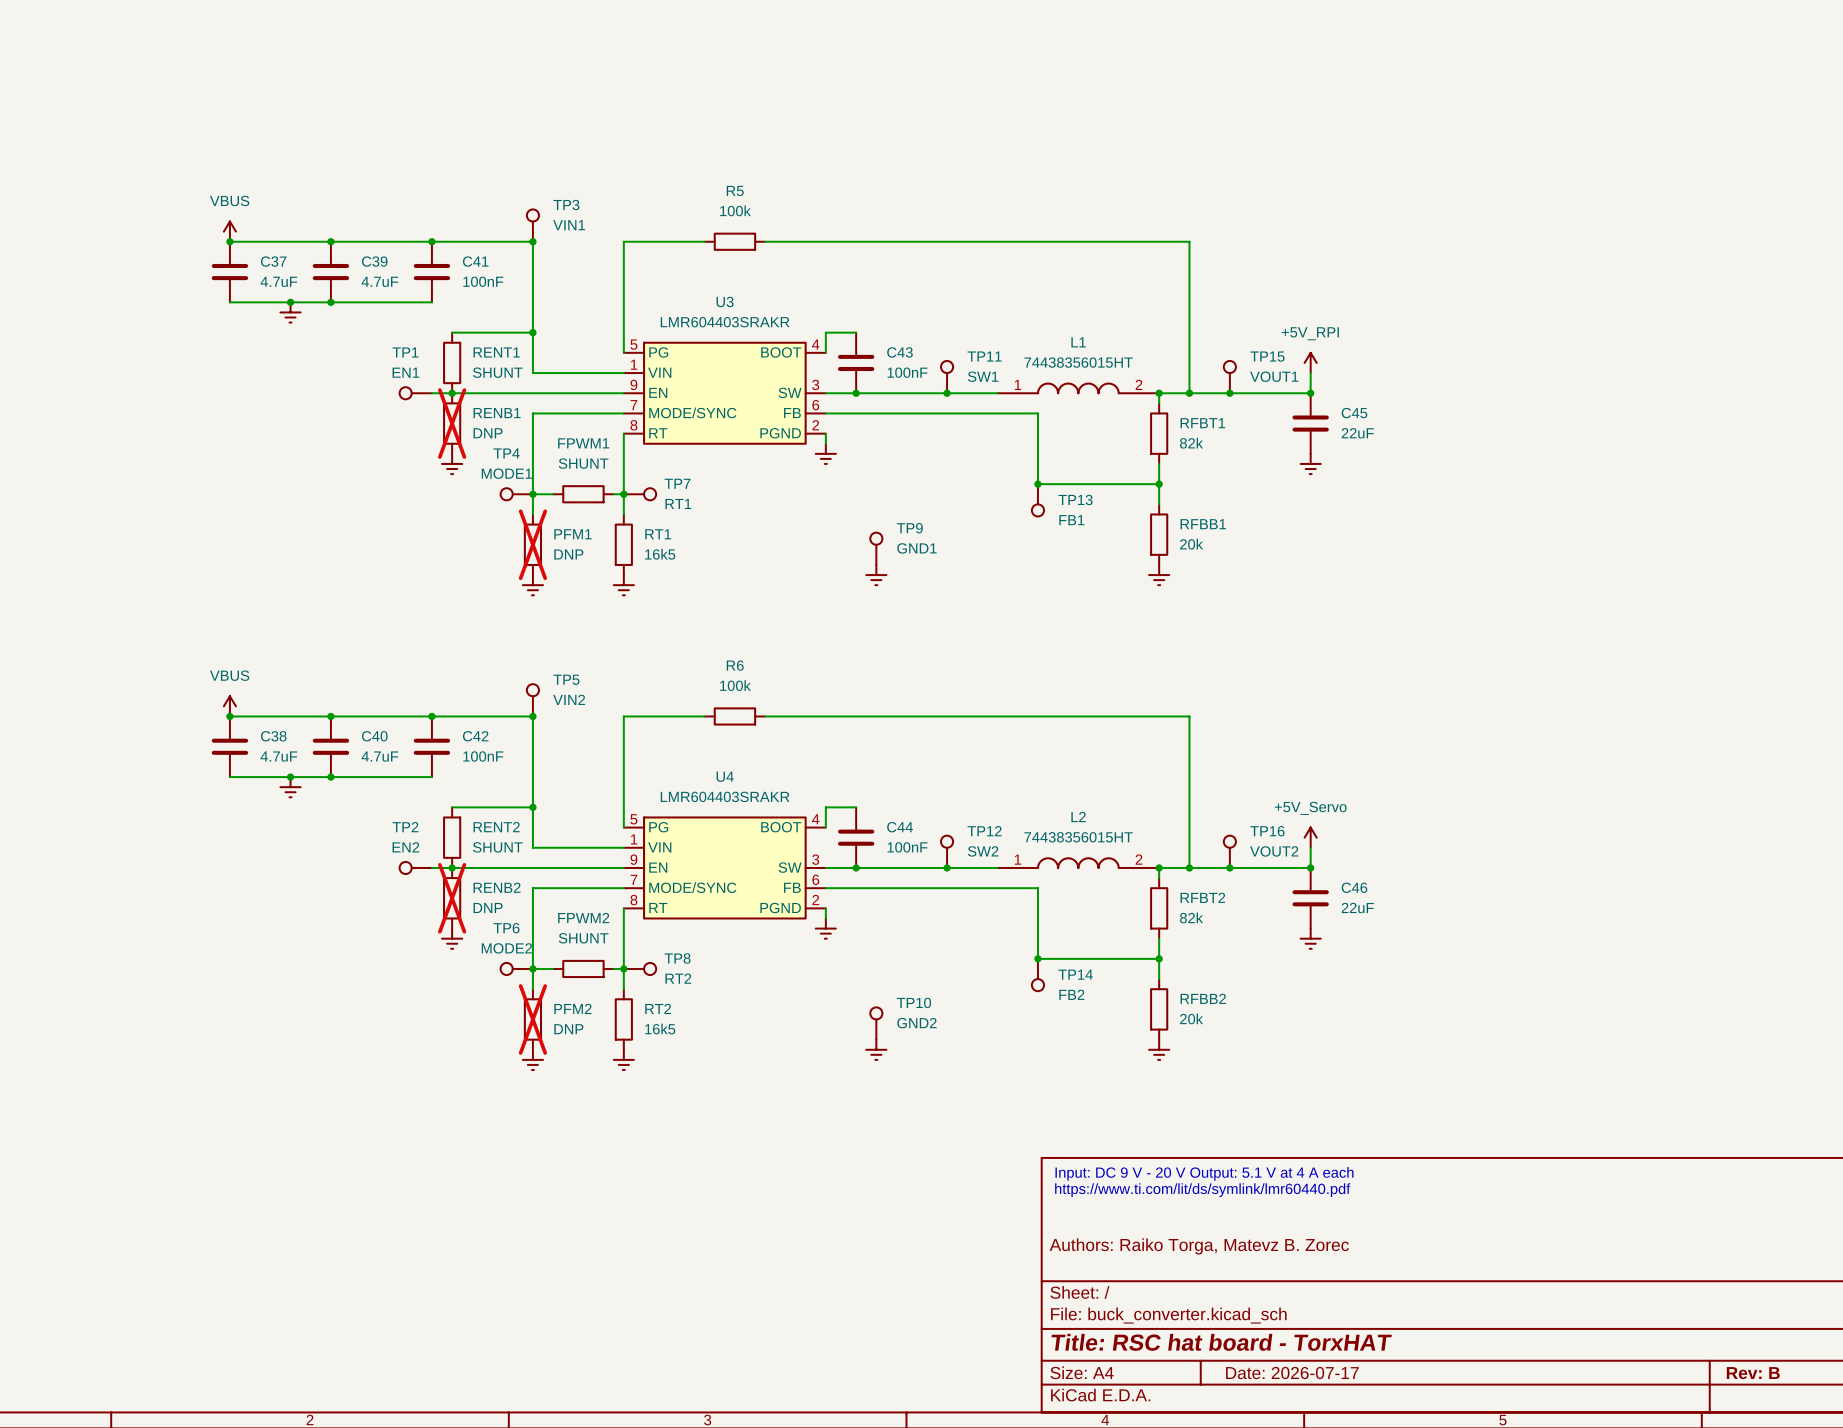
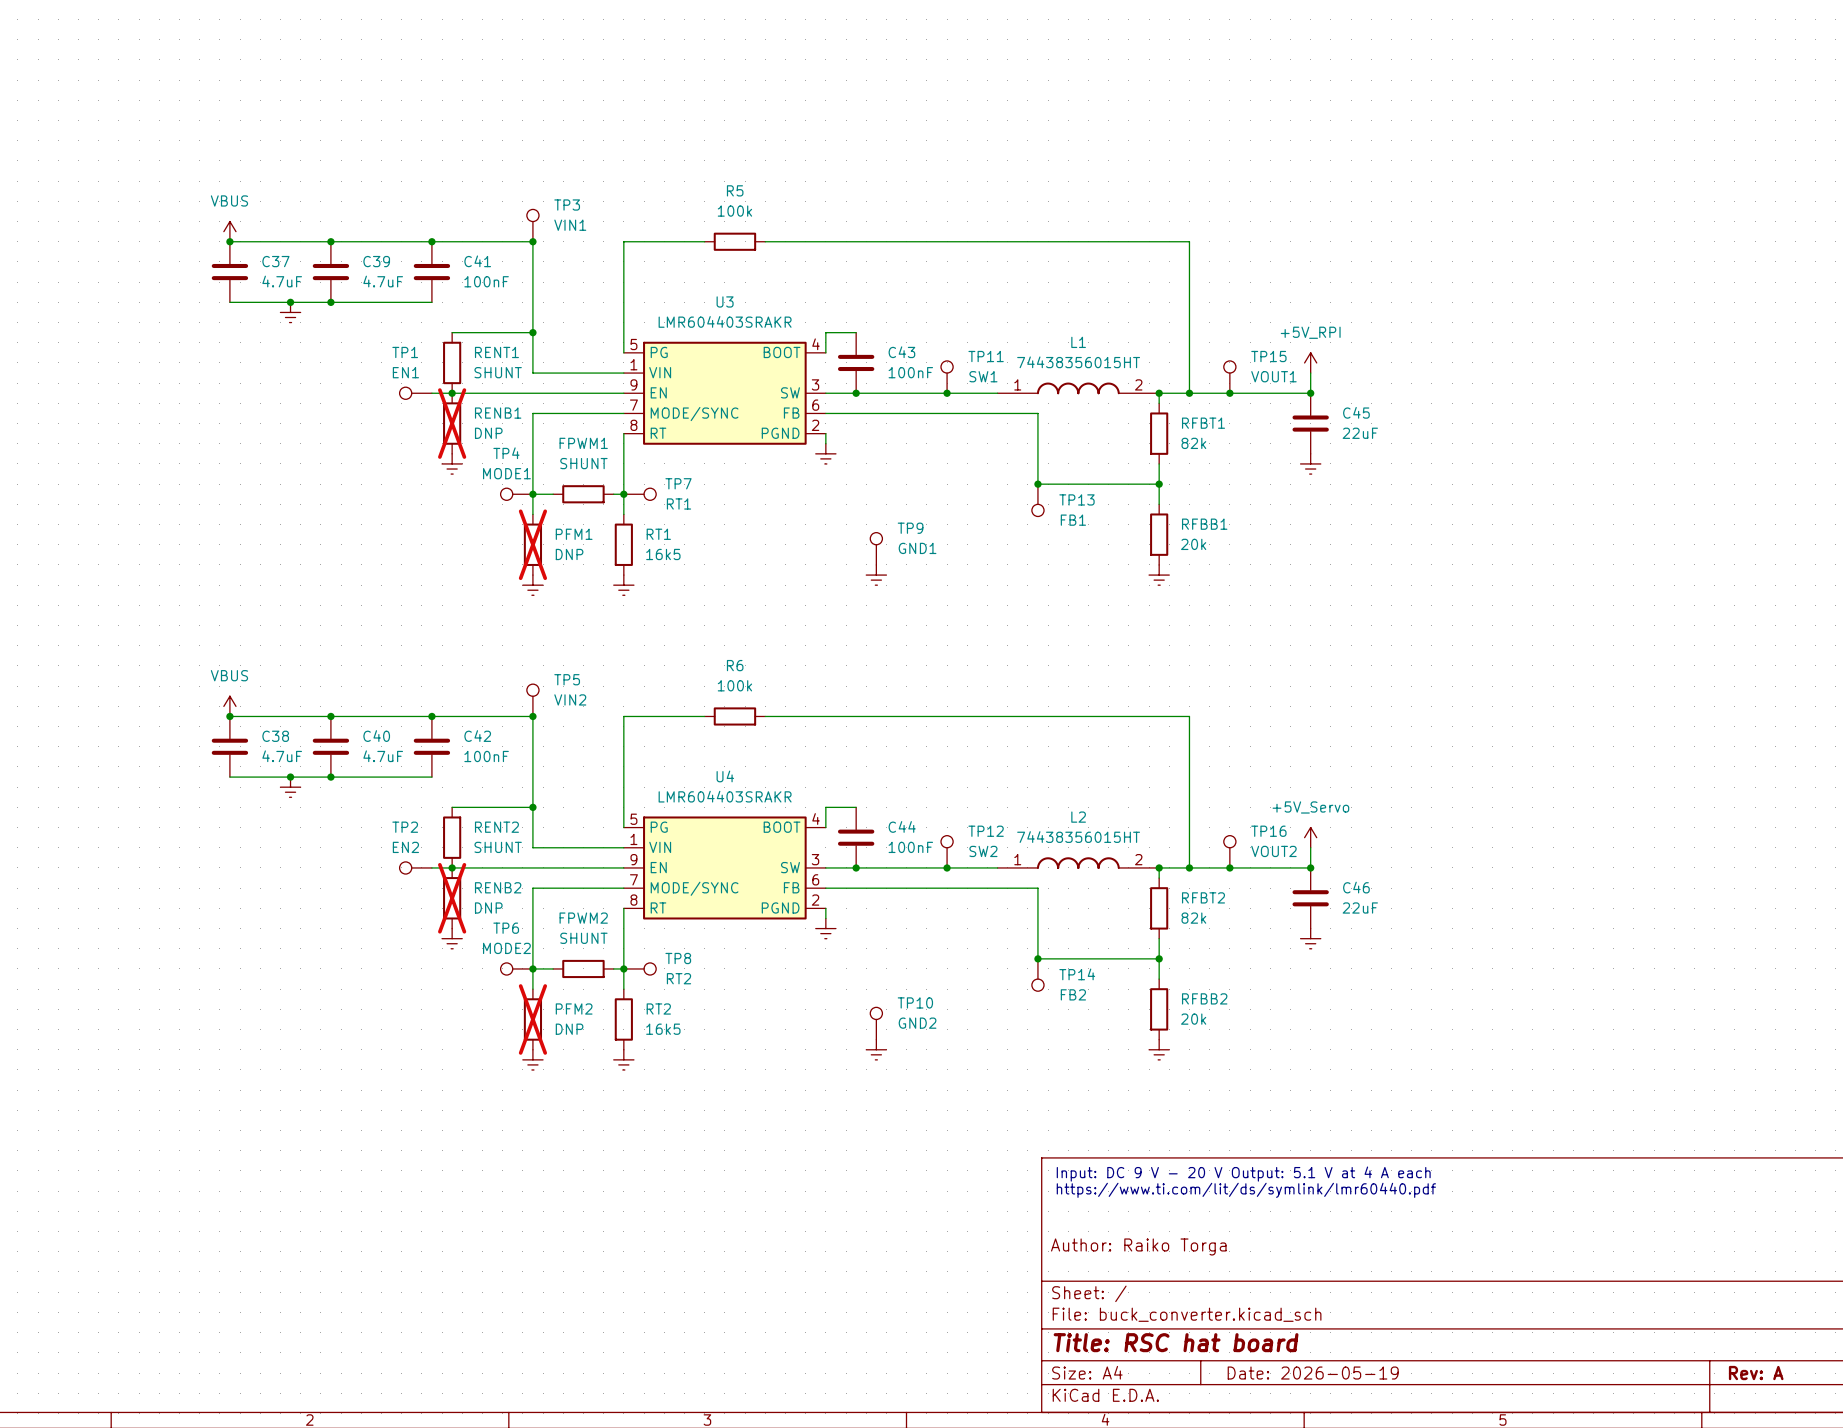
title block: Authors: Raiko Torga, Matevz B. Zorec (1199, 1246) -> Author: Raiko Torga (1138, 1246)
title block: Title: RSC hat board - TorxHAT (1221, 1342) -> Title: RSC hat board (1176, 1342)
title block: Date: 2026-07-17 (1292, 1373) -> Date: 2026-05-19 (1313, 1373)
title block: Rev: B (1753, 1373) -> Rev: A (1756, 1373)

